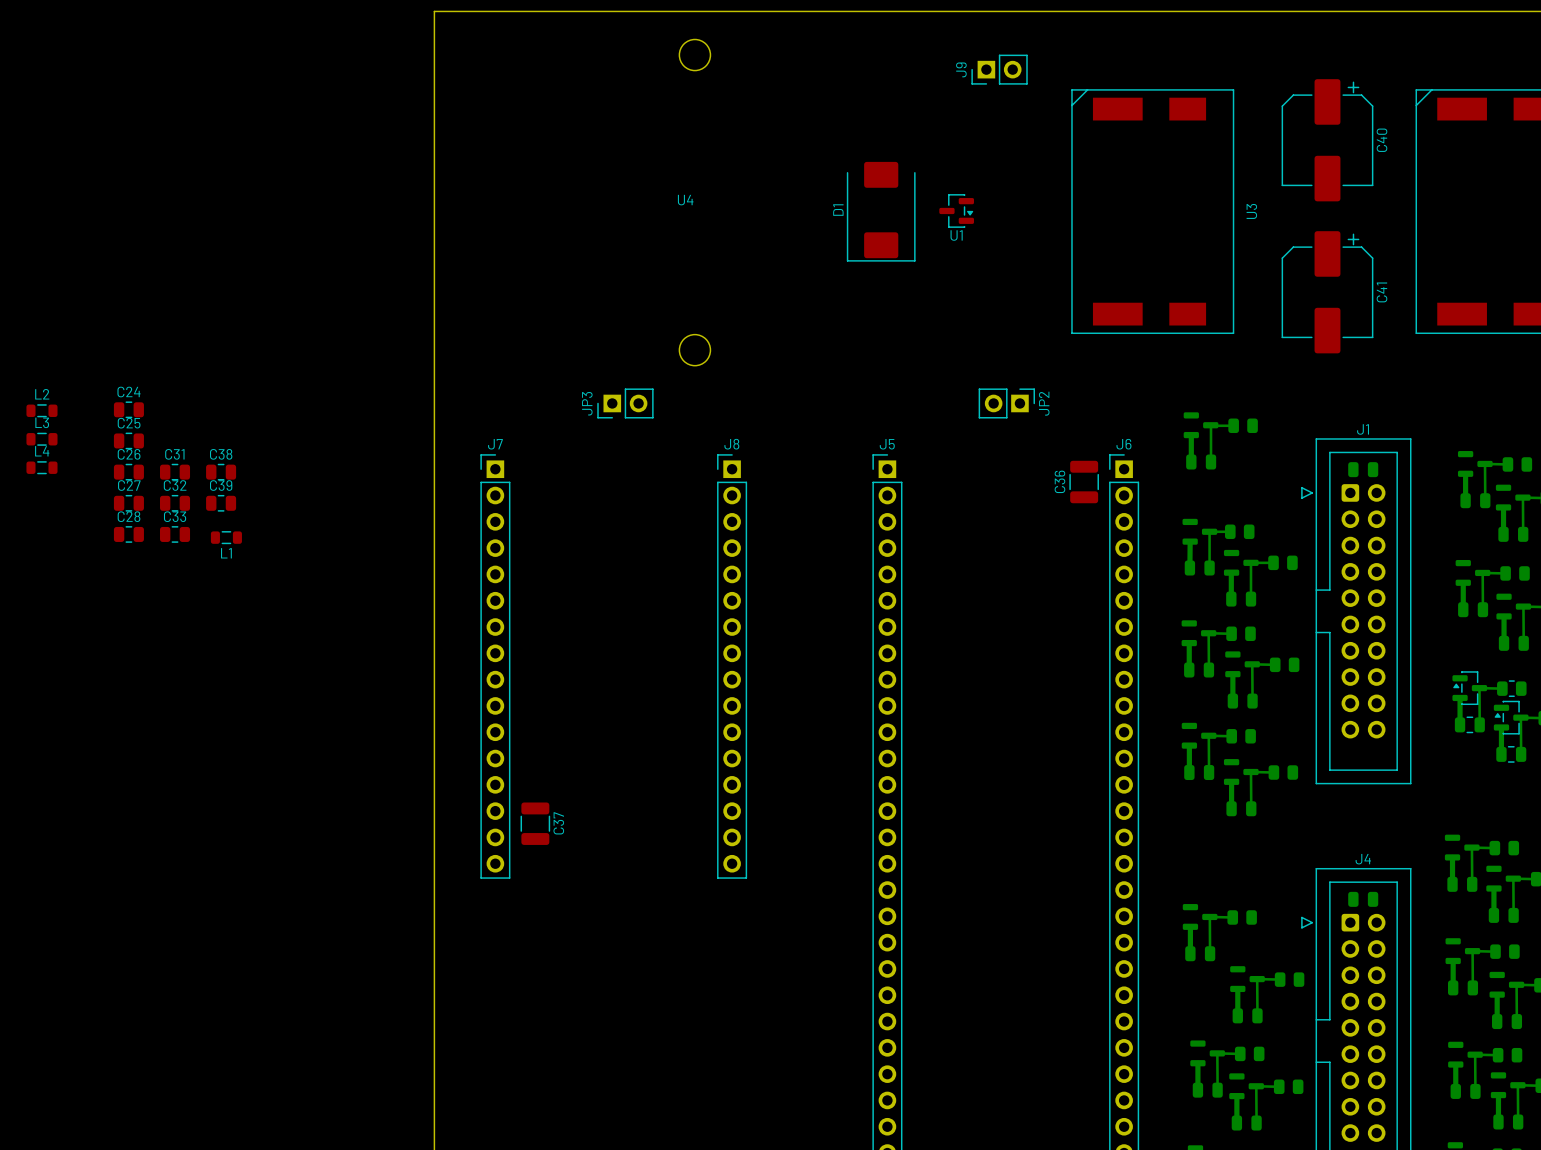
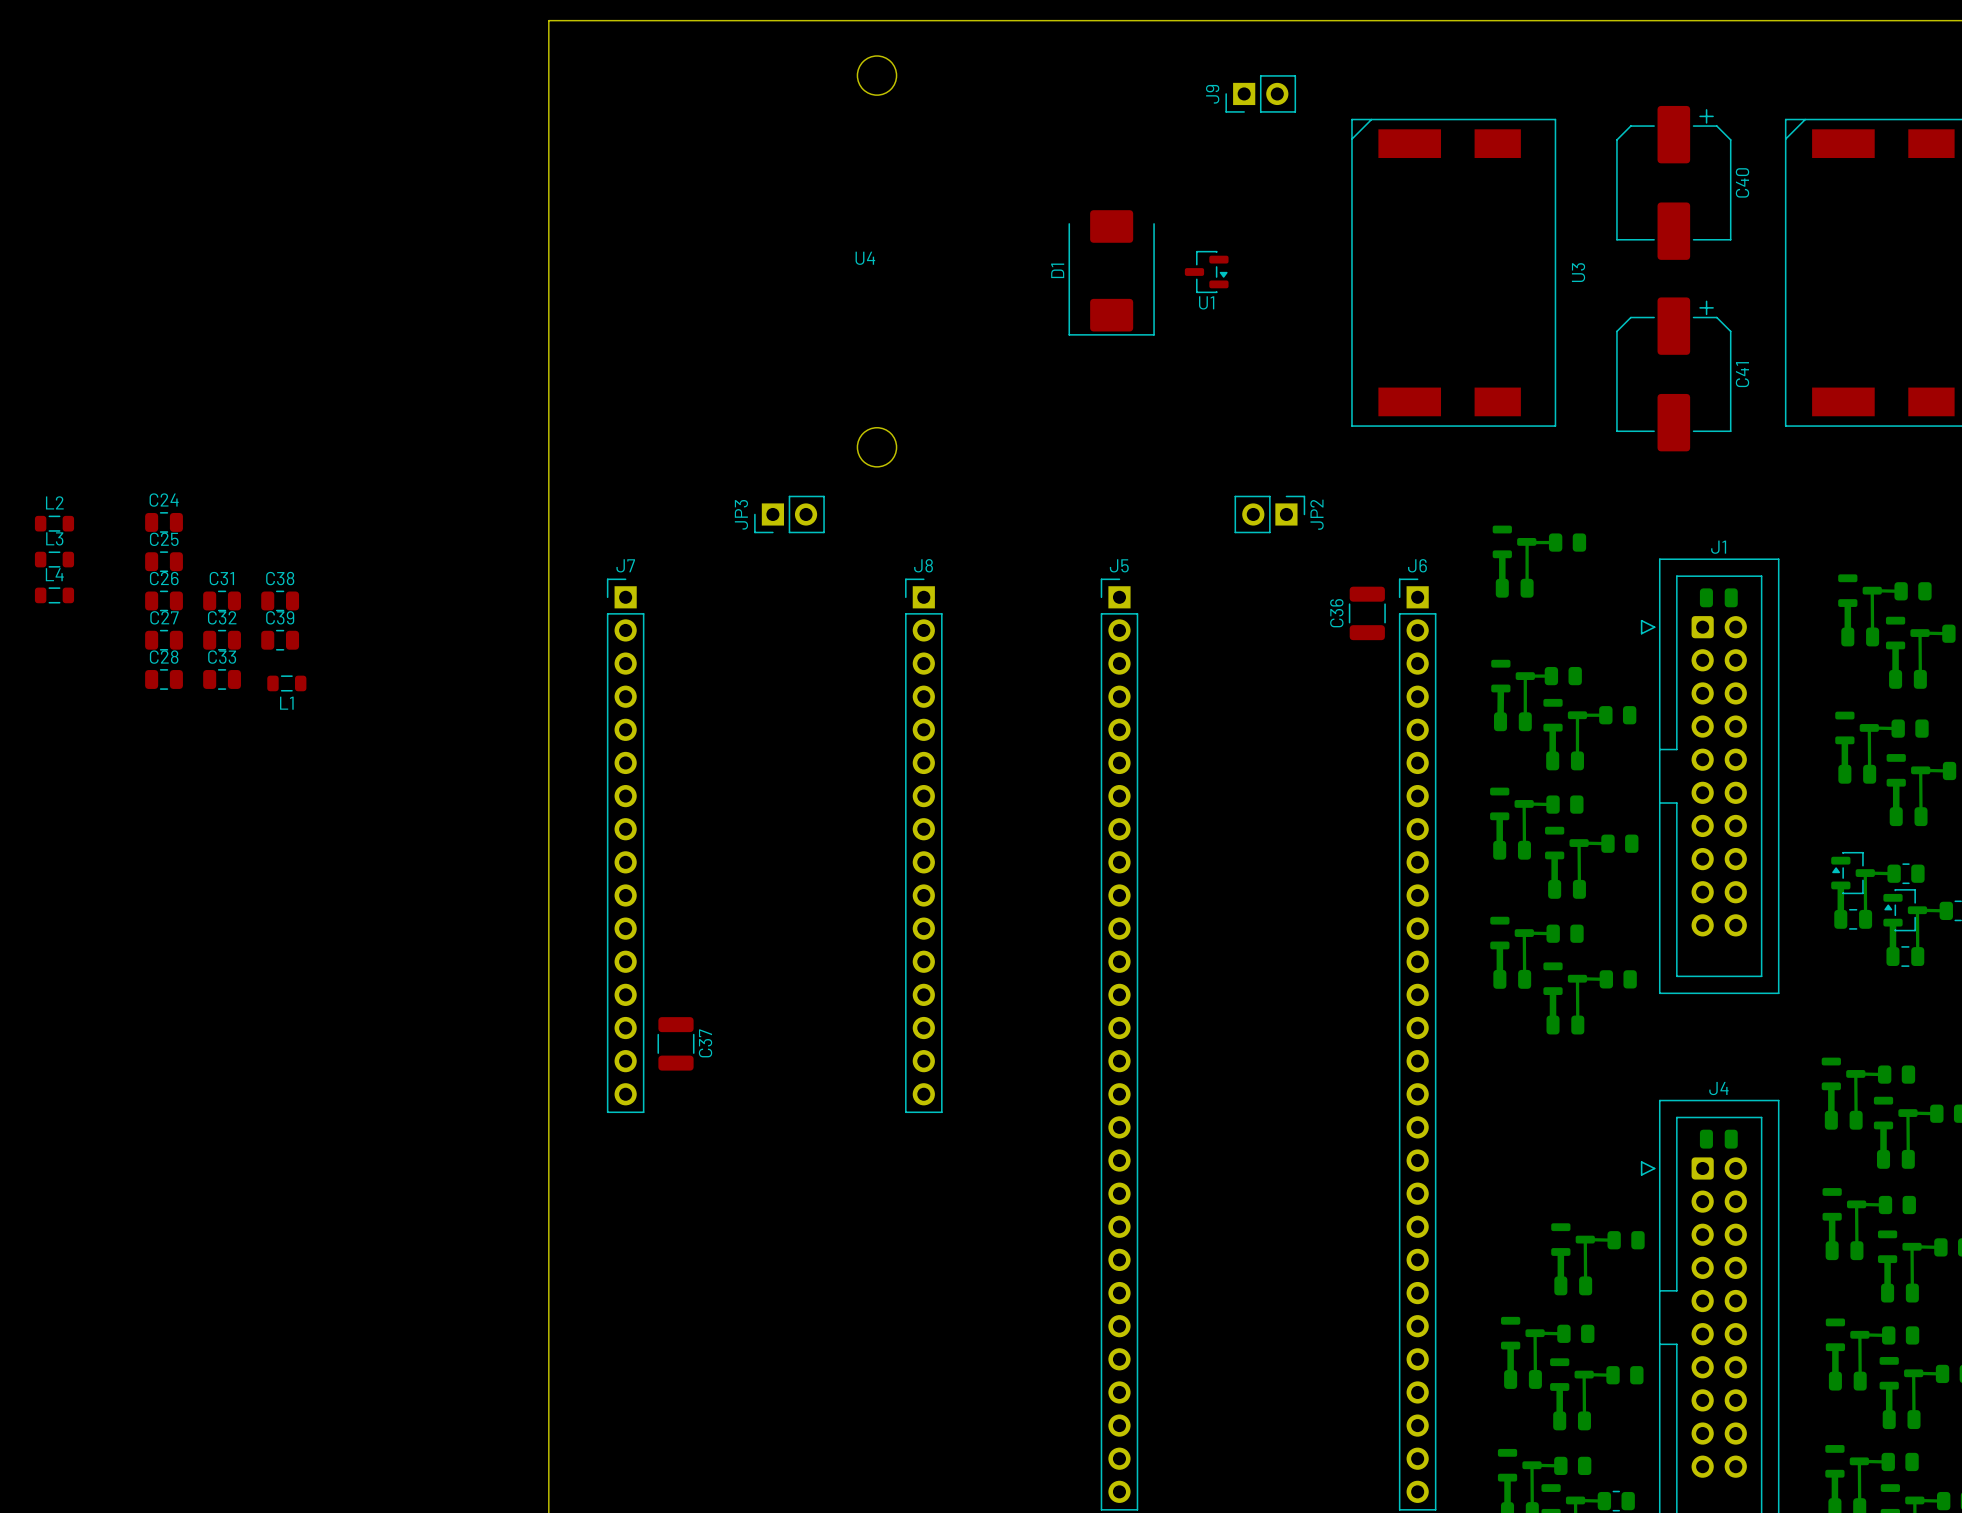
part: (1200, 916) -> none
bottom track: (1232, 917) (1209, 916) (1210, 953) -> none
part: (1242, 917) -> none
bottom track: (1190, 926) (1190, 953) -> none
part: (1200, 953) -> none

